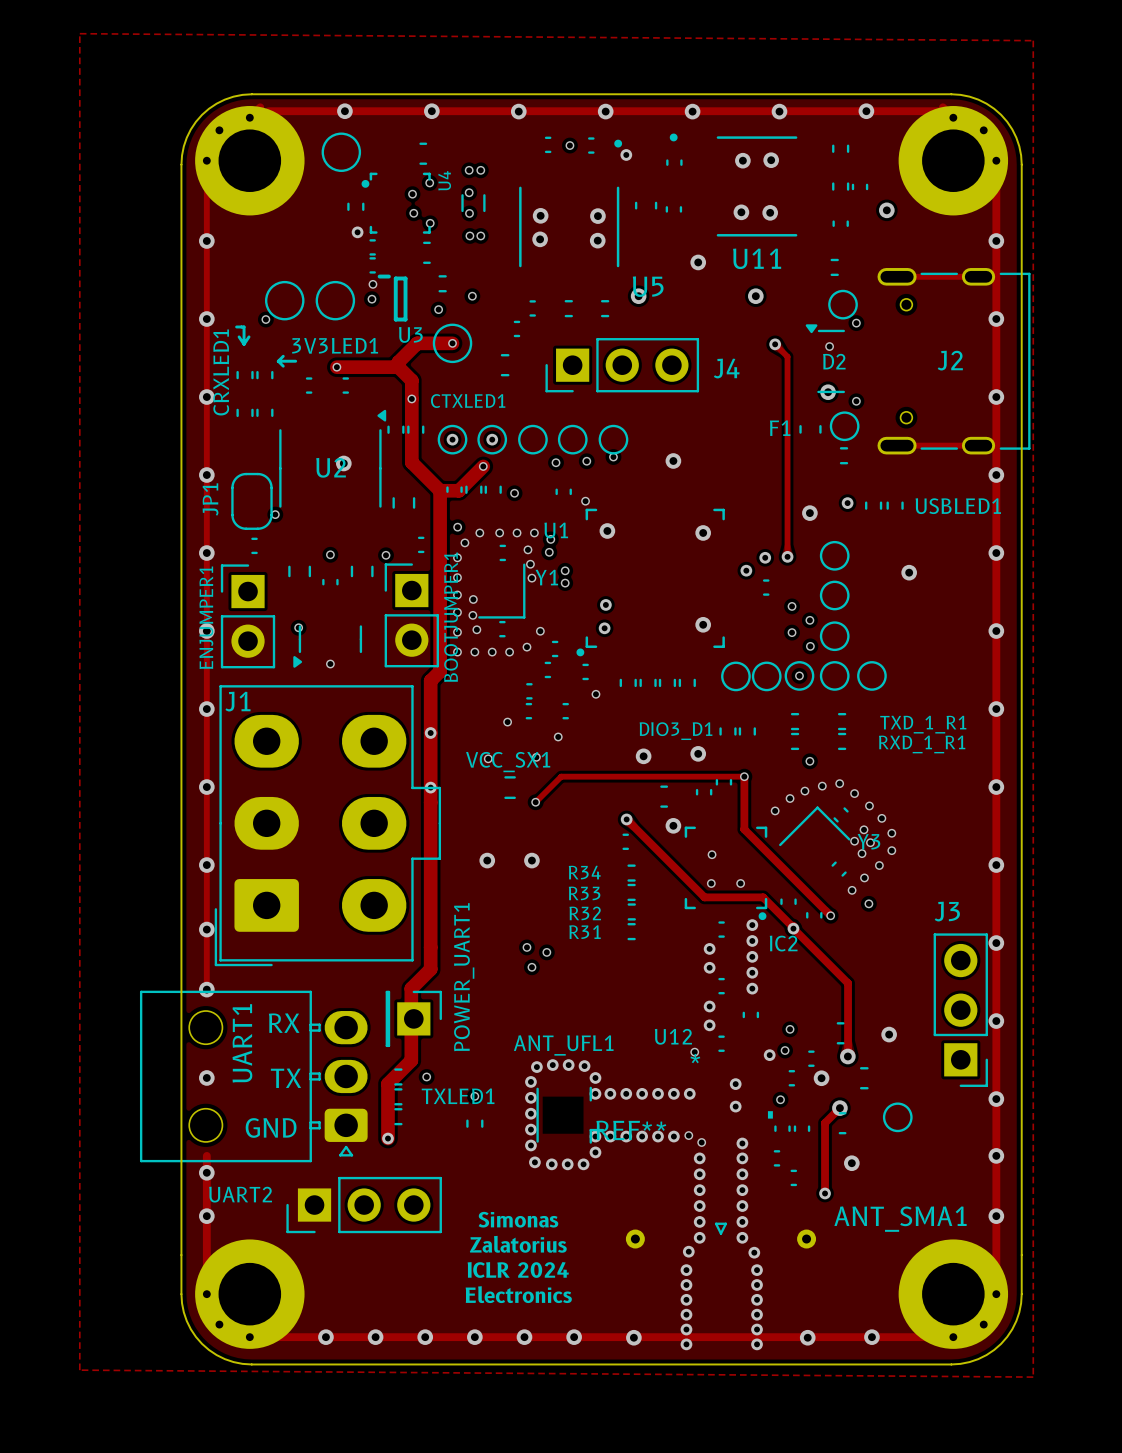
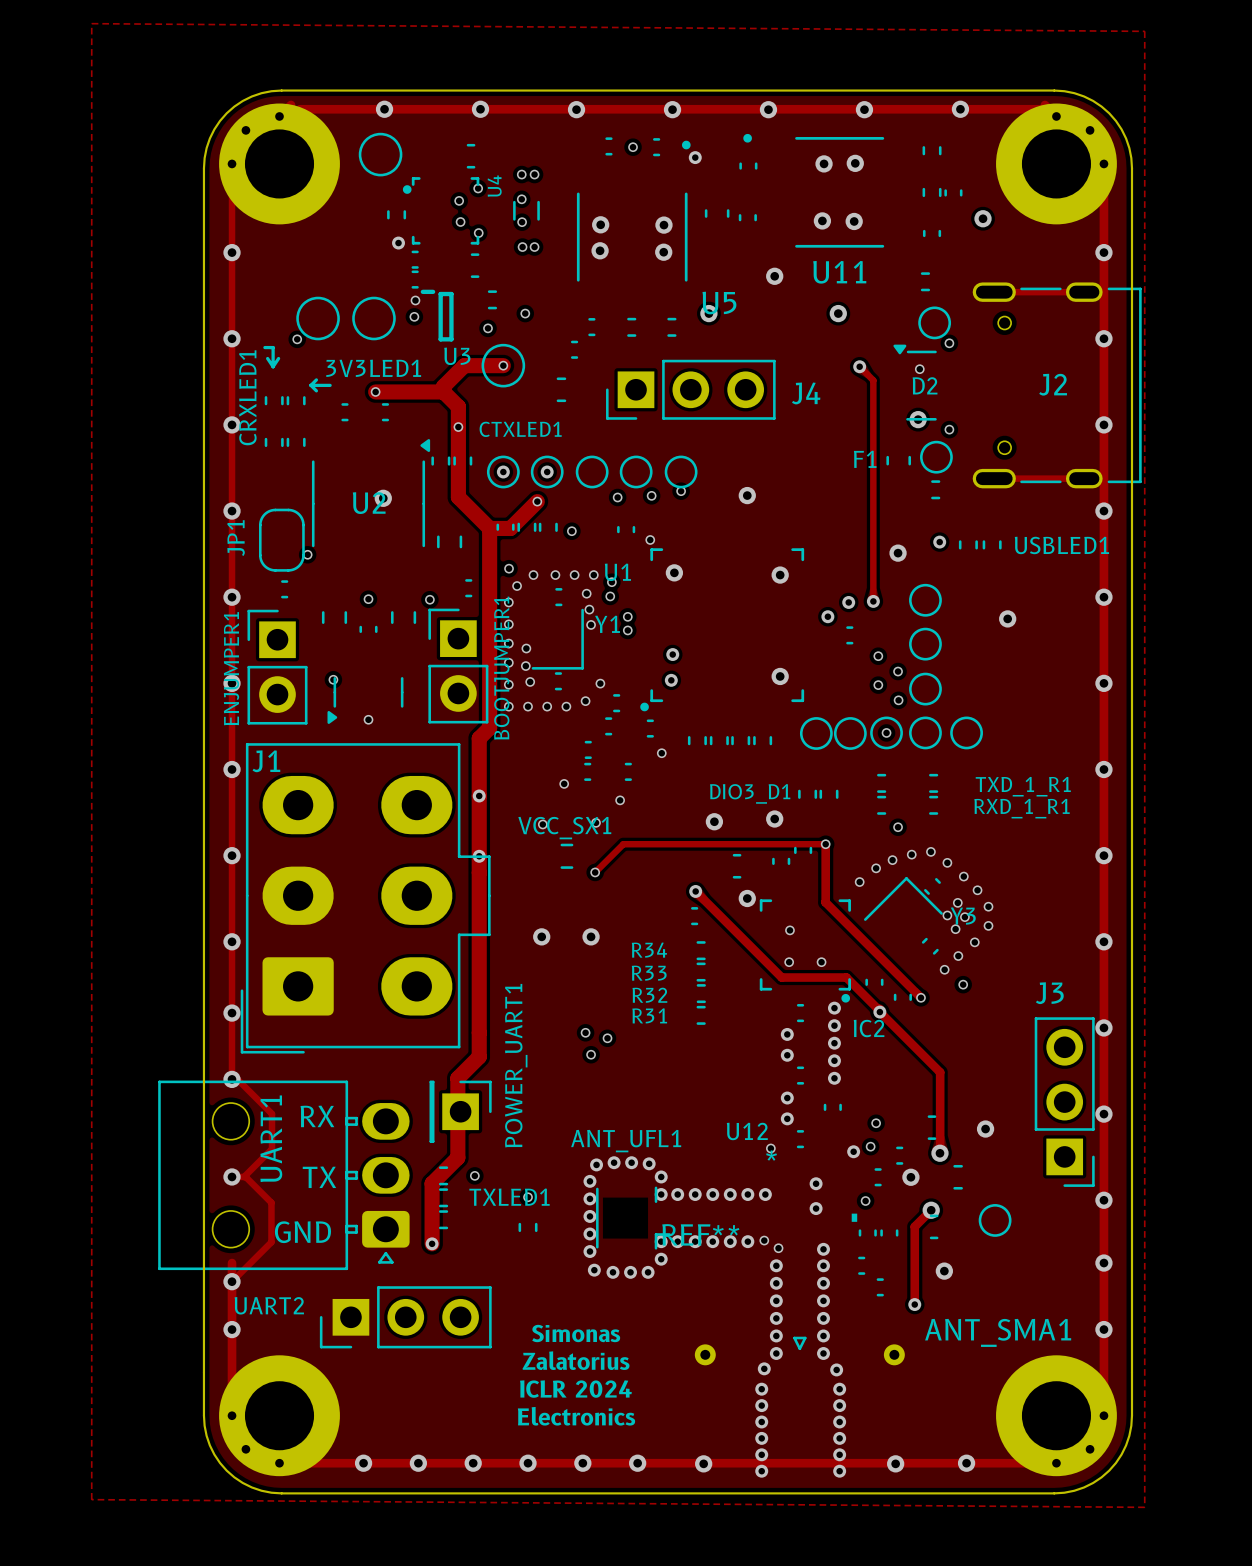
track: none -> (231, 1079) (237, 1079) (272, 1113) (272, 1149) (244, 1176)
track: none -> (231, 1176) (245, 1176) (271, 1202) (271, 1242) (231, 1281) (232, 1415)

